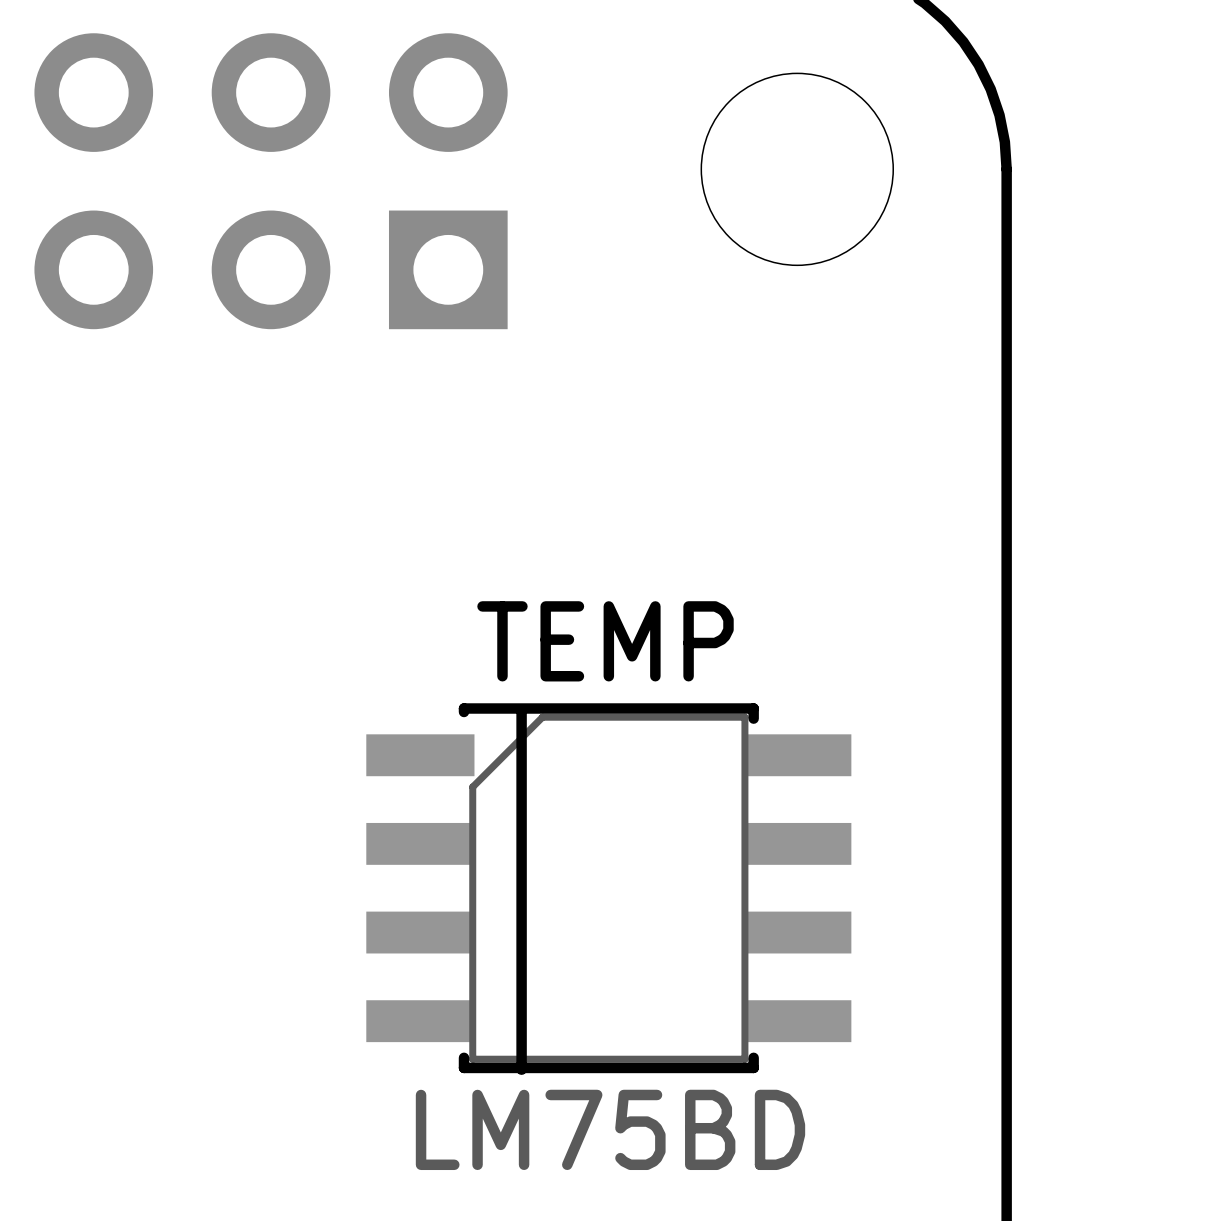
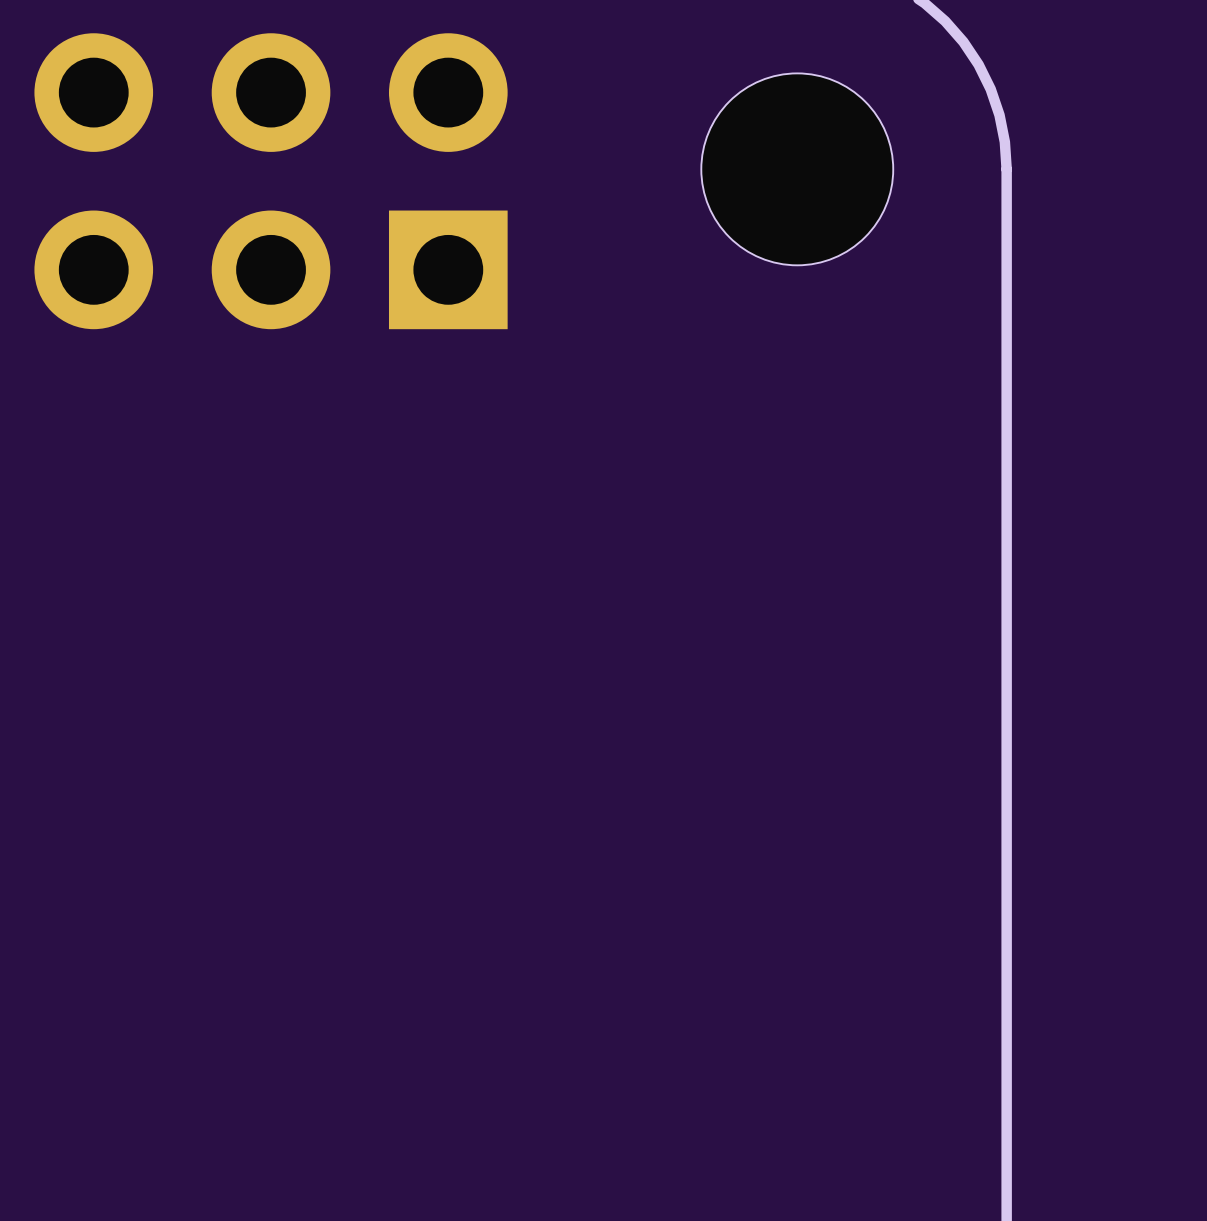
TEMP: LM75BD (608, 889) -> none

